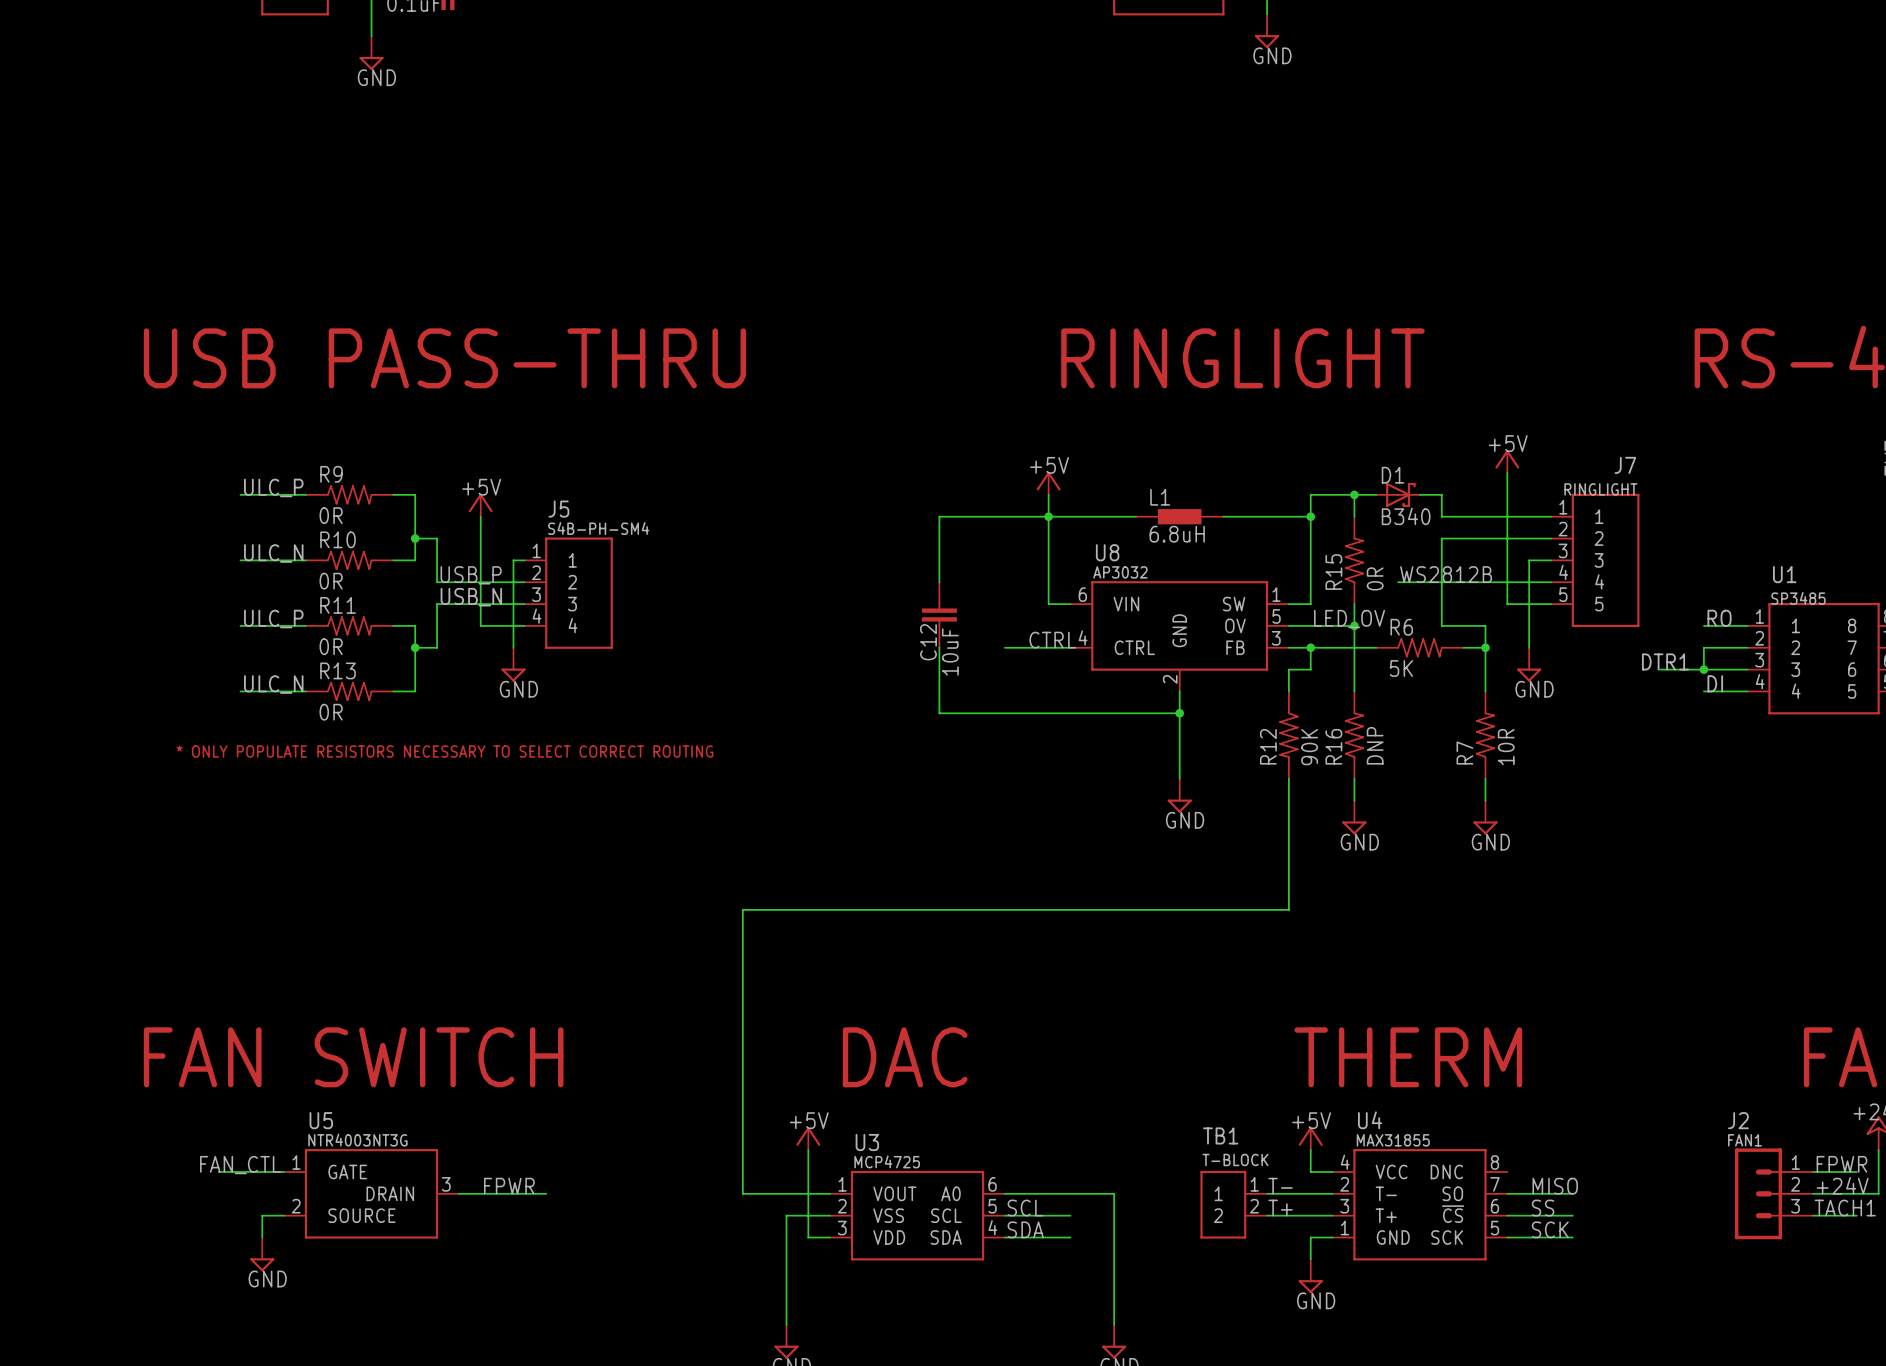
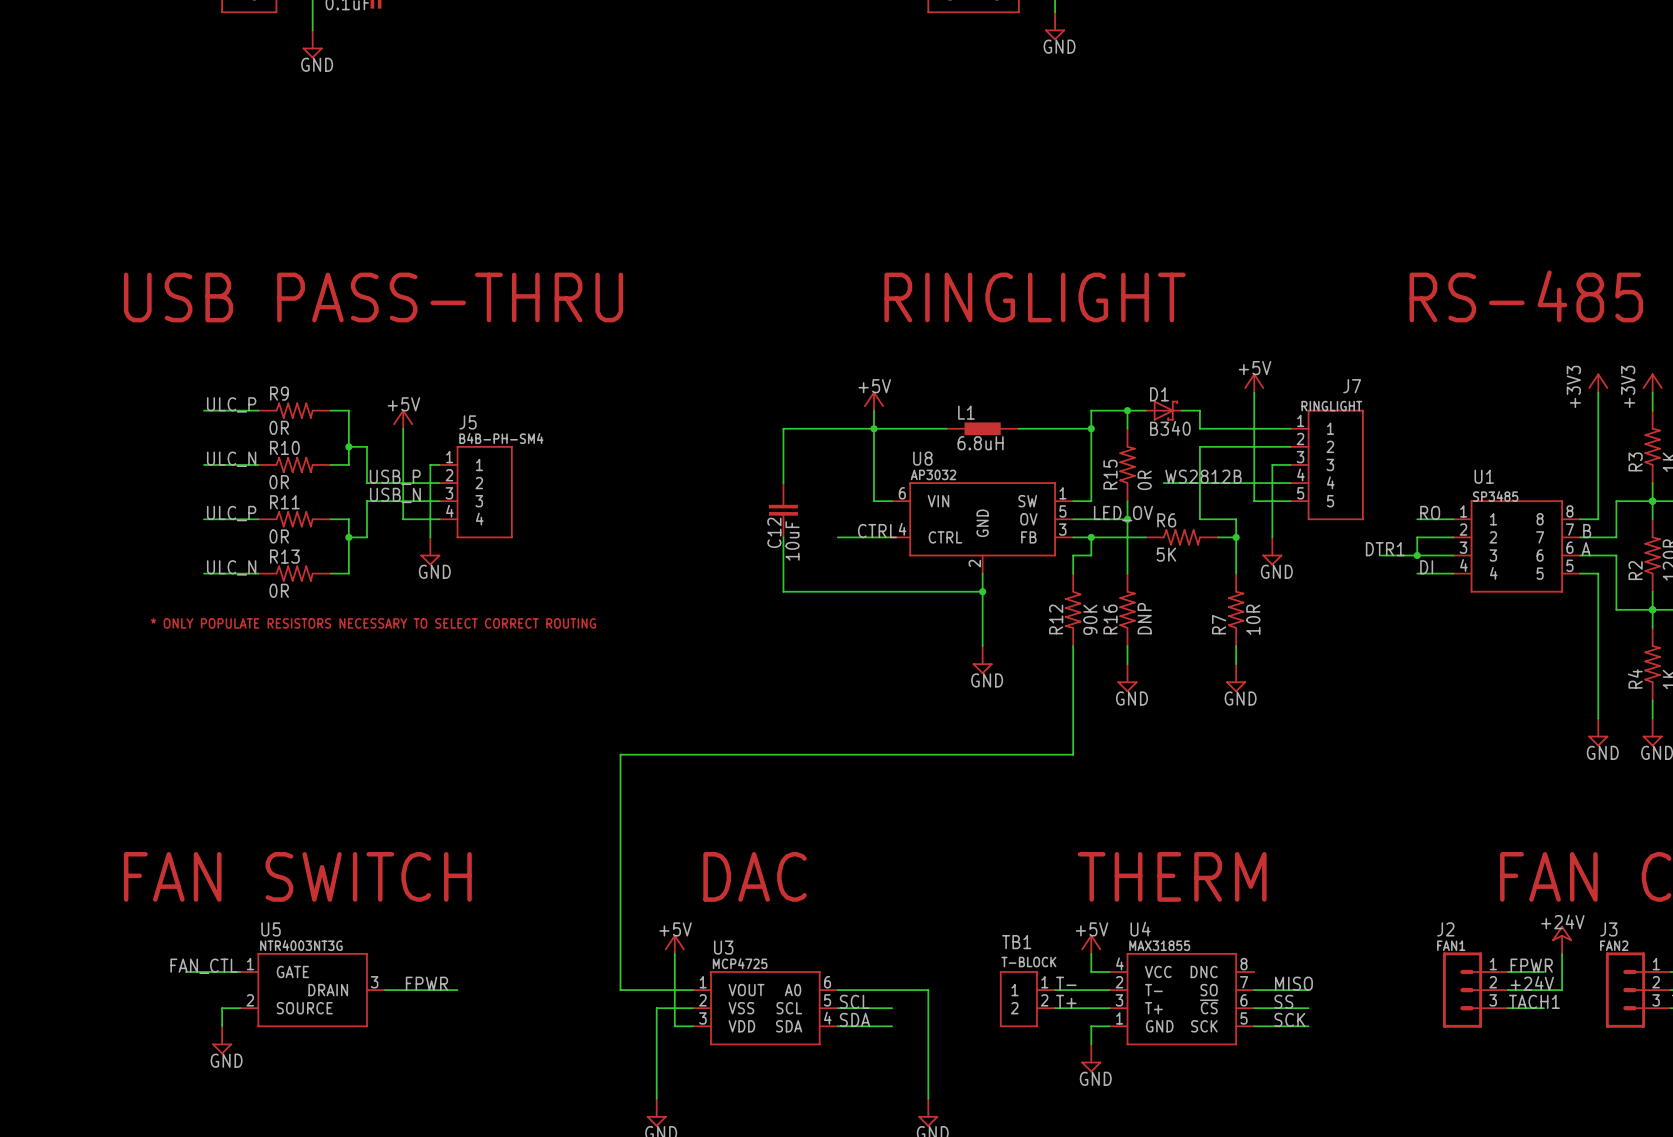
J5 value: S4B-PH-SM4 (598, 528) -> B4B-PH-SM4 (501, 438)

